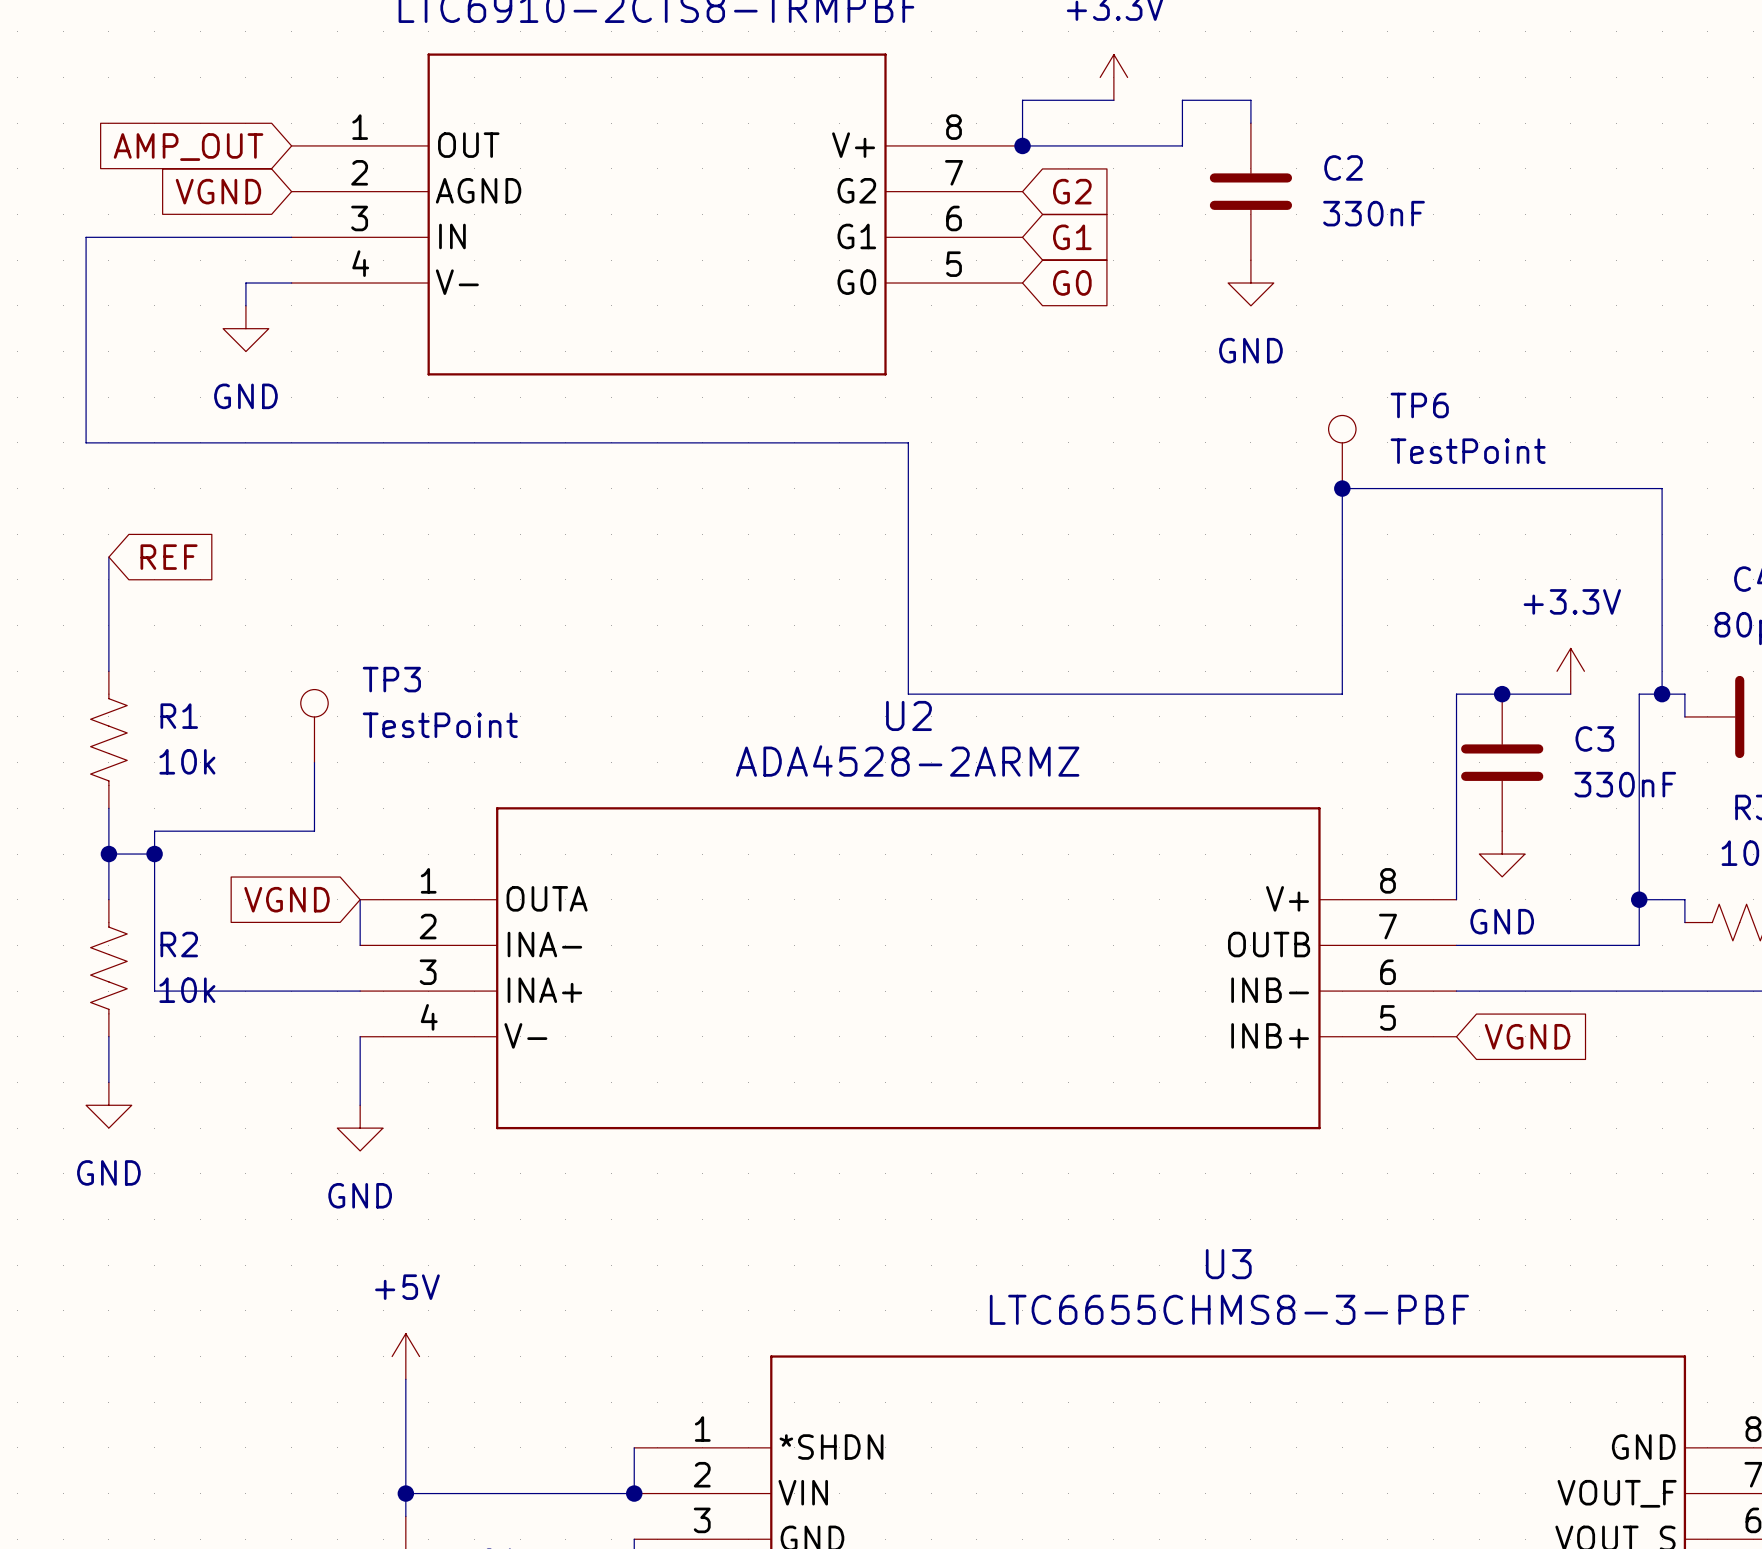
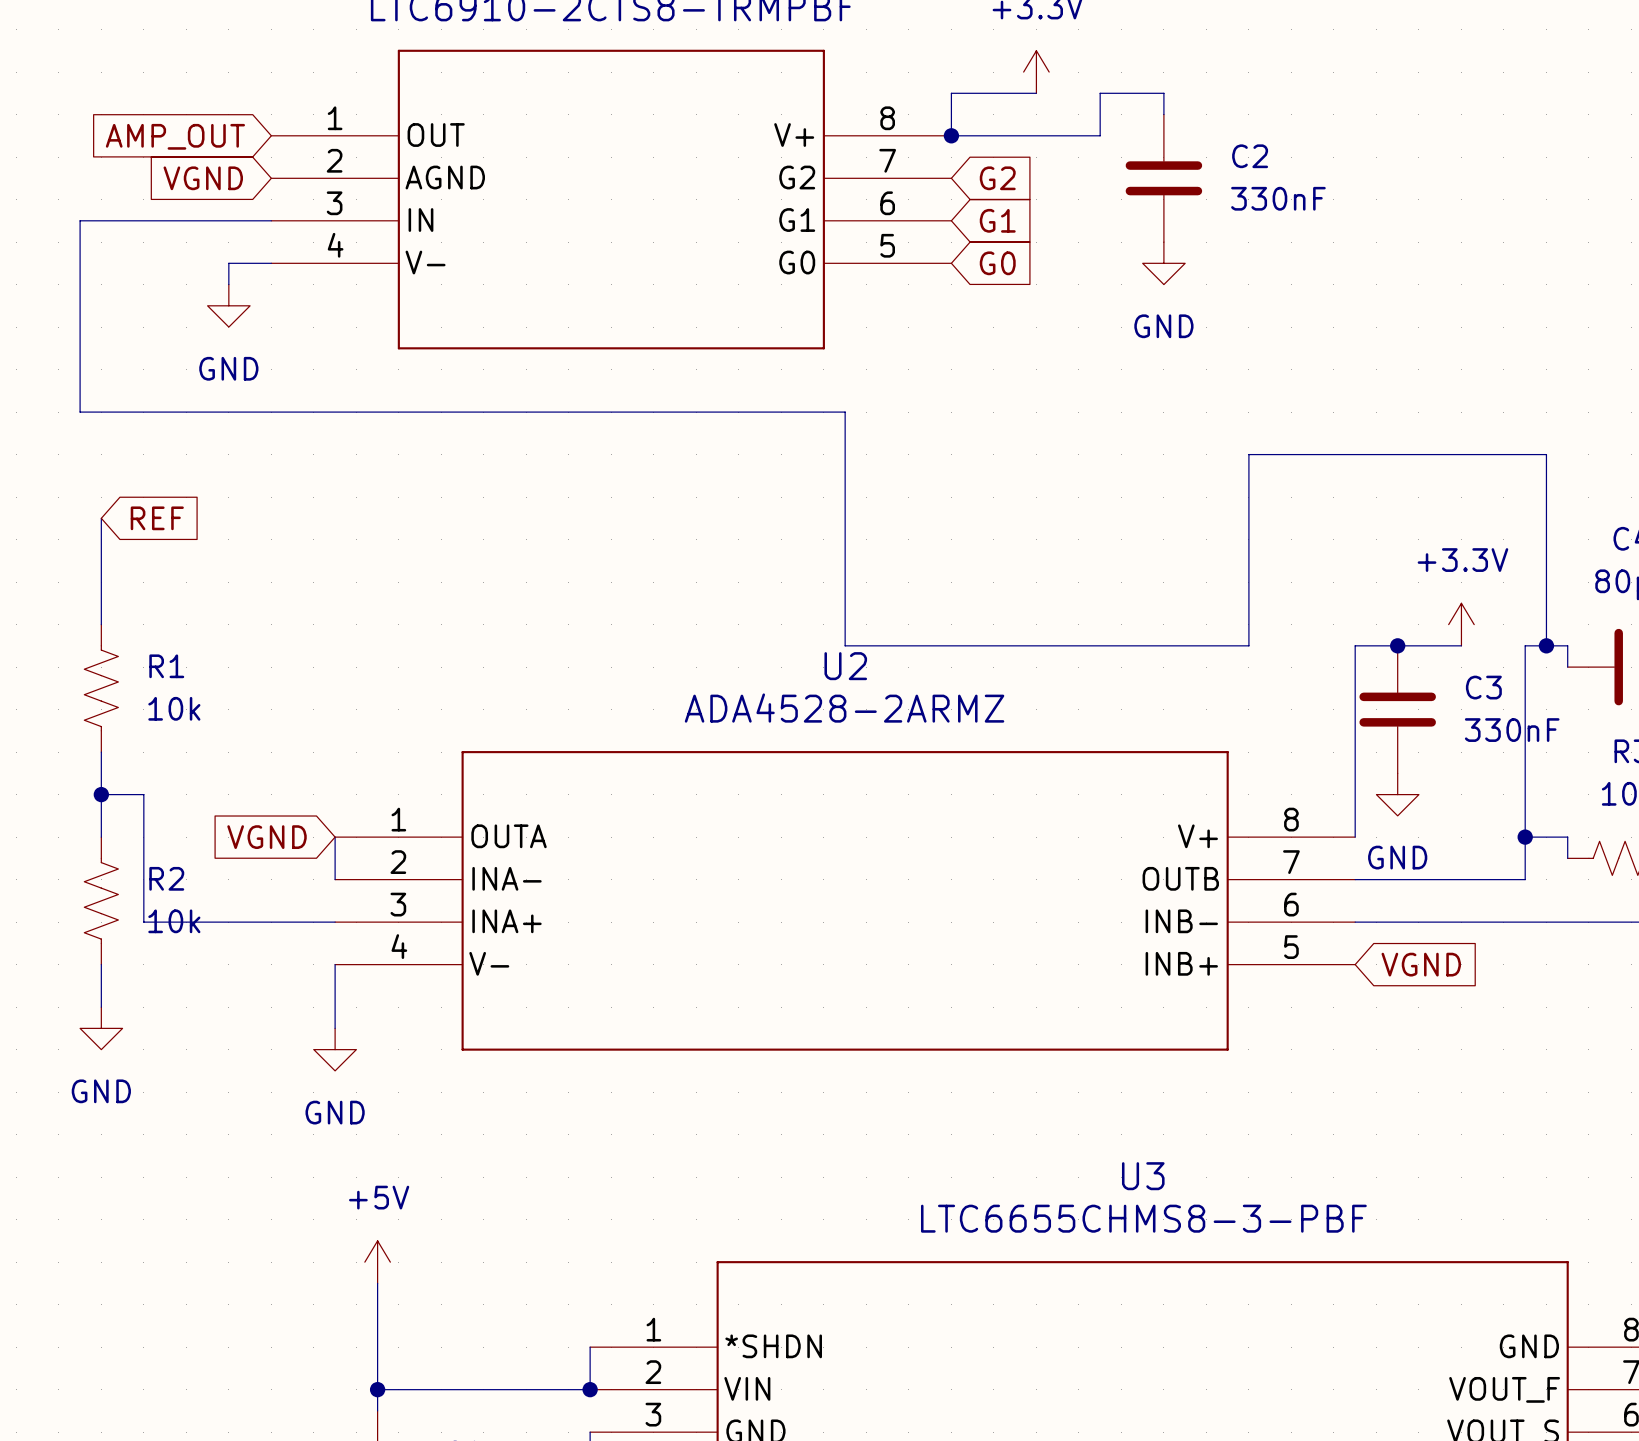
TP6: TestPoint (1342, 452) -> none
junction: (1342, 488) -> none
TP3: TestPoint (314, 726) -> none
wire: (314, 762) (314, 831) (154, 831) (154, 854) -> none
junction: (154, 854) -> none

